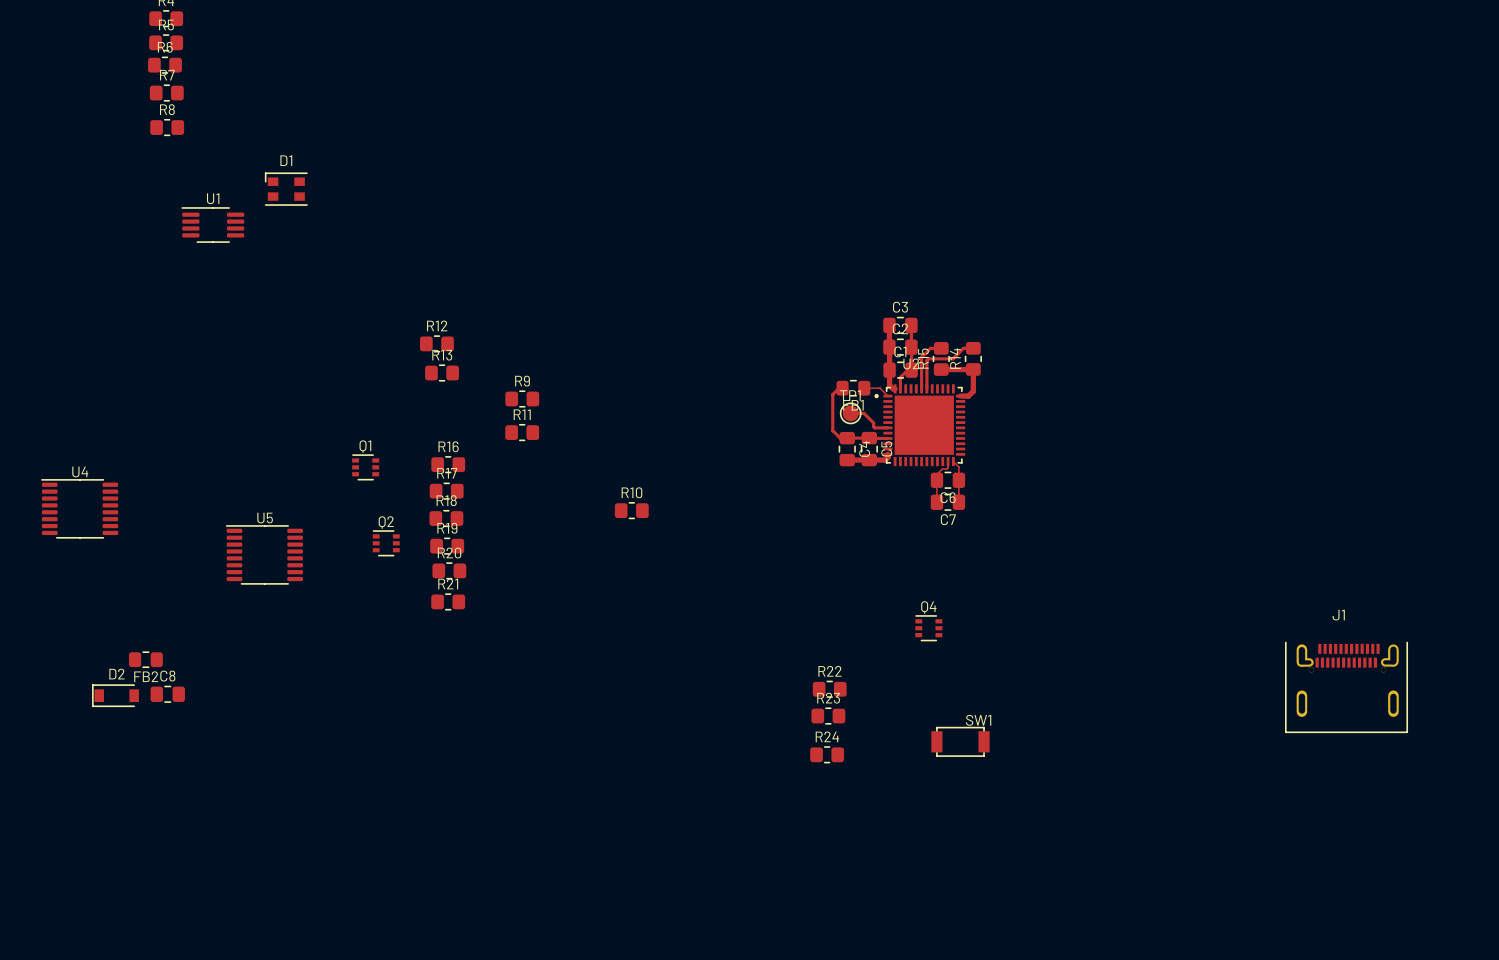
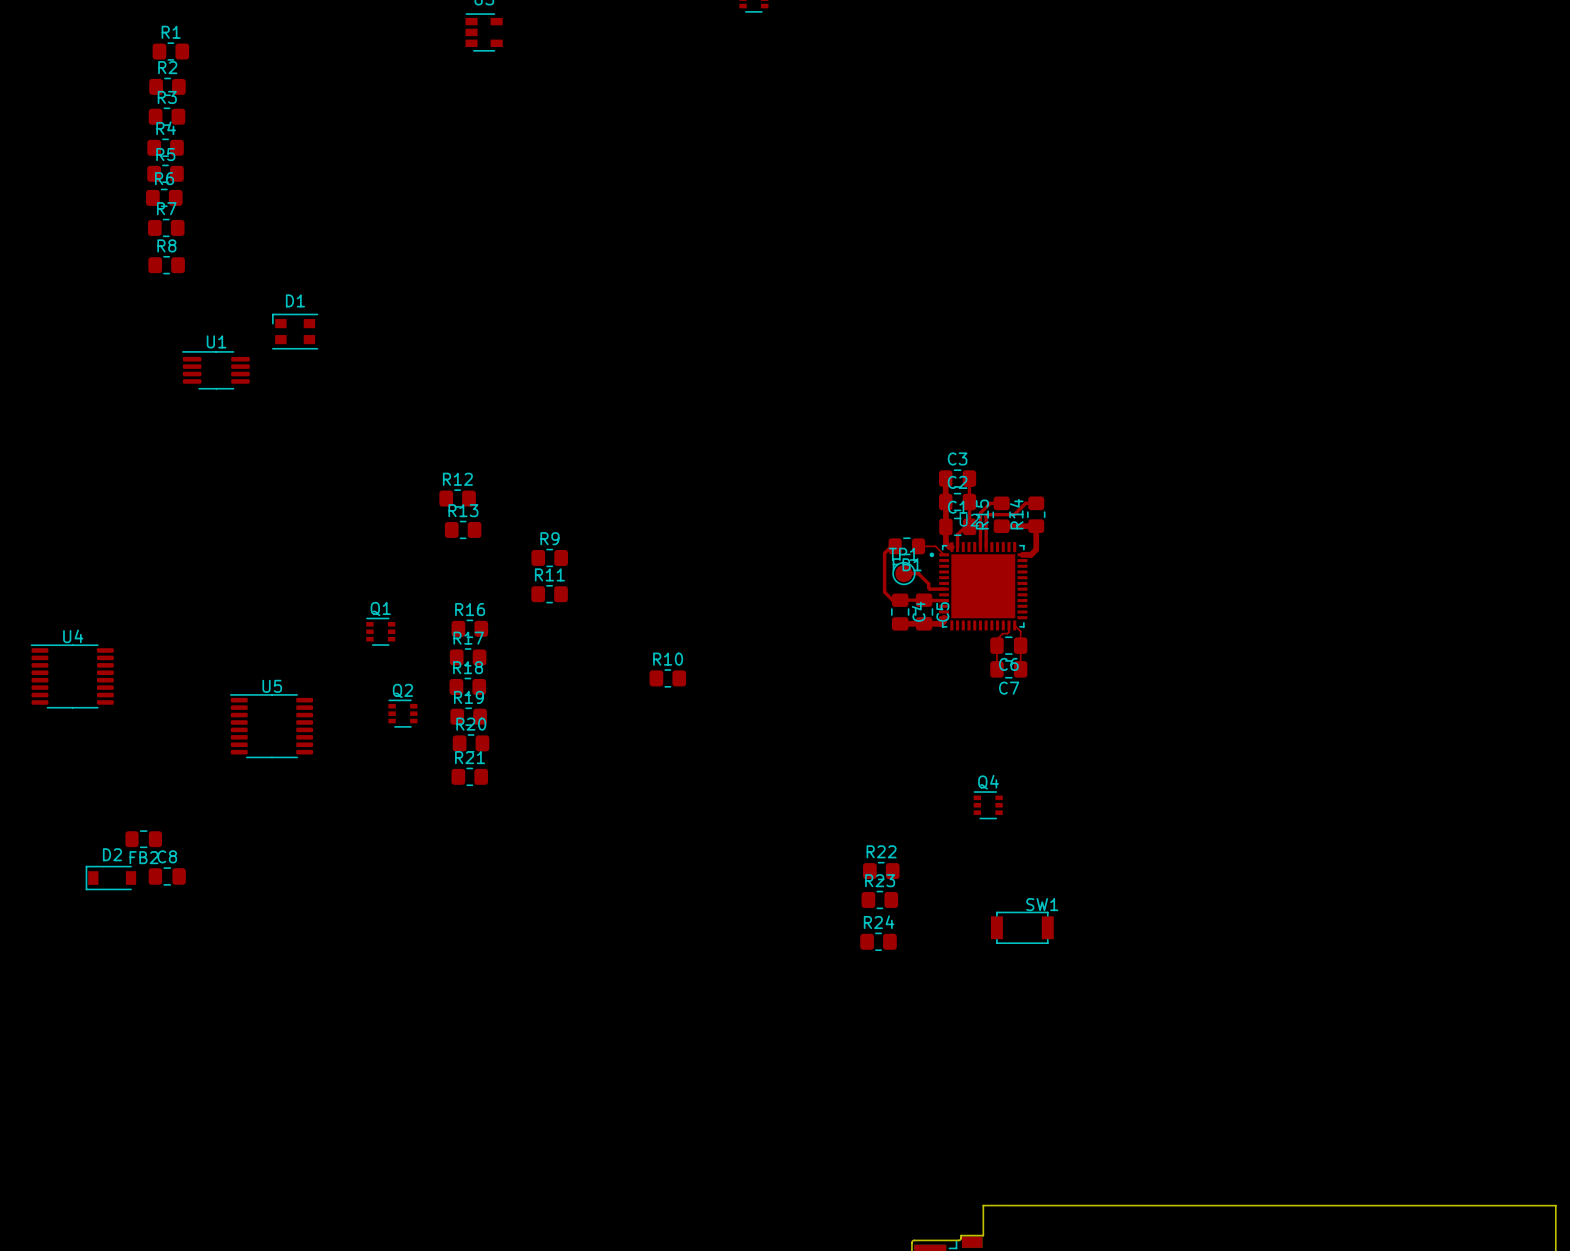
J1: (1346, 687) -> none

